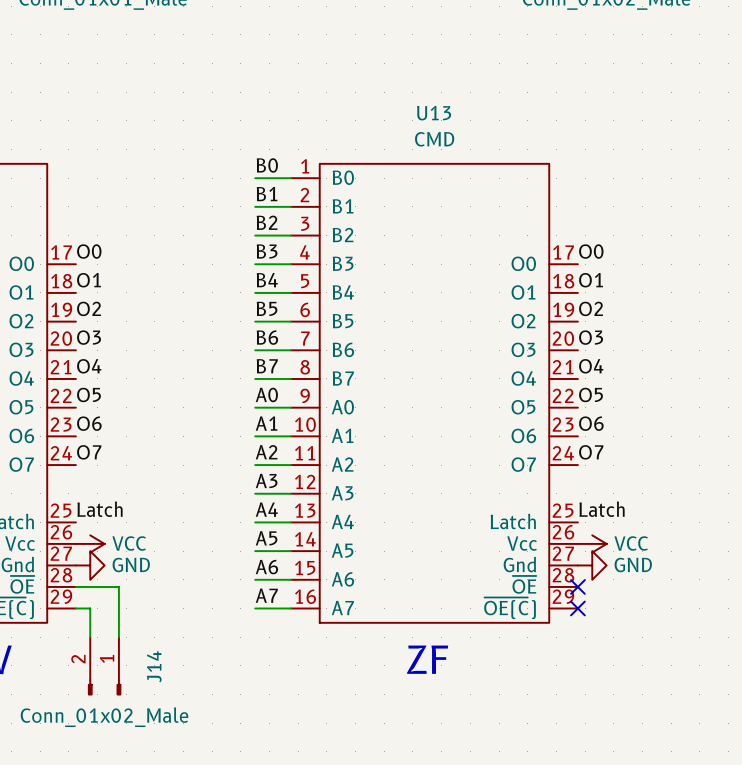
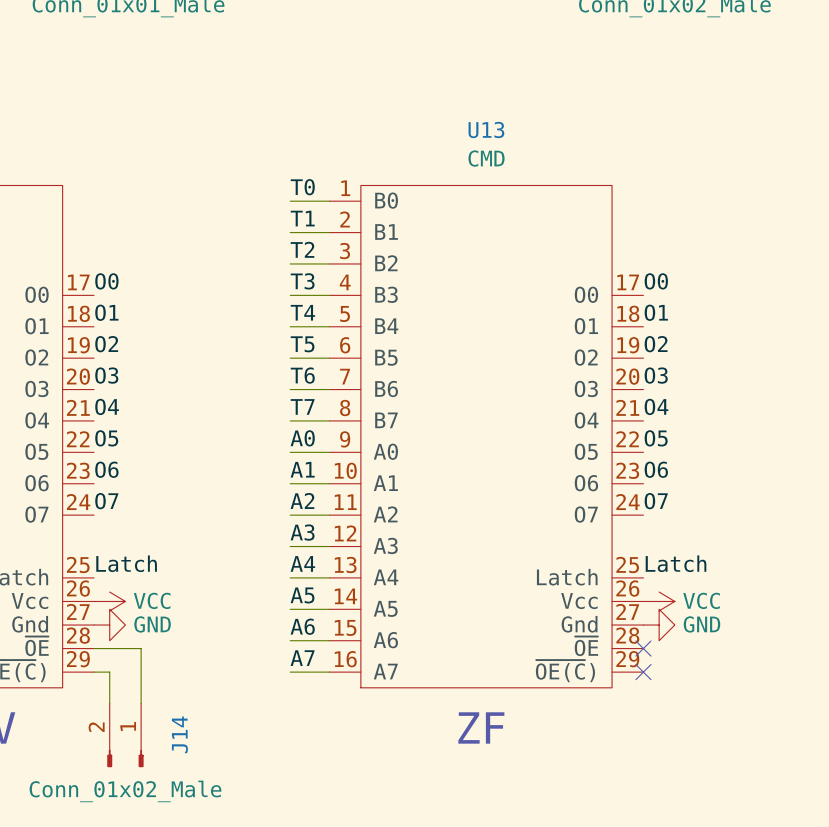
label: B0 (267, 165) -> T0 (302, 187)
label: B1 (267, 194) -> T1 (302, 218)
label: B2 (267, 222) -> T2 (302, 249)
label: B3 (267, 251) -> T3 (302, 281)
label: B4 (267, 280) -> T4 (302, 312)
label: B5 (267, 308) -> T5 (302, 344)
label: B6 (267, 337) -> T6 (302, 375)
label: B7 (267, 366) -> T7 (302, 406)

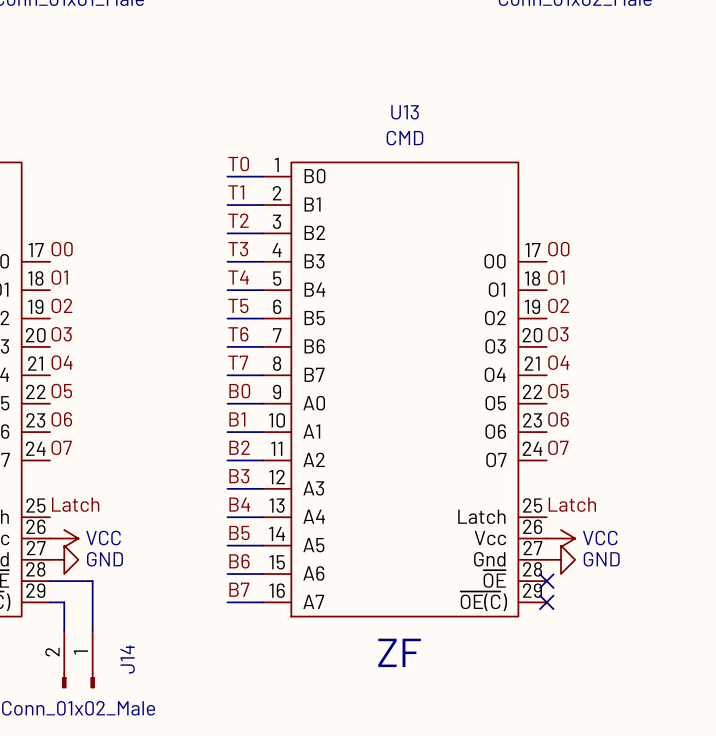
label: A0 (302, 438) -> B0 (239, 391)
label: A1 (302, 469) -> B1 (237, 419)
label: A2 (302, 500) -> B2 (239, 447)
label: A3 (302, 532) -> B3 (239, 476)
label: A4 (302, 563) -> B4 (239, 504)
label: A5 (302, 595) -> B5 (239, 533)
label: A6 (302, 626) -> B6 (239, 561)
label: A7 (302, 658) -> B7 (239, 589)

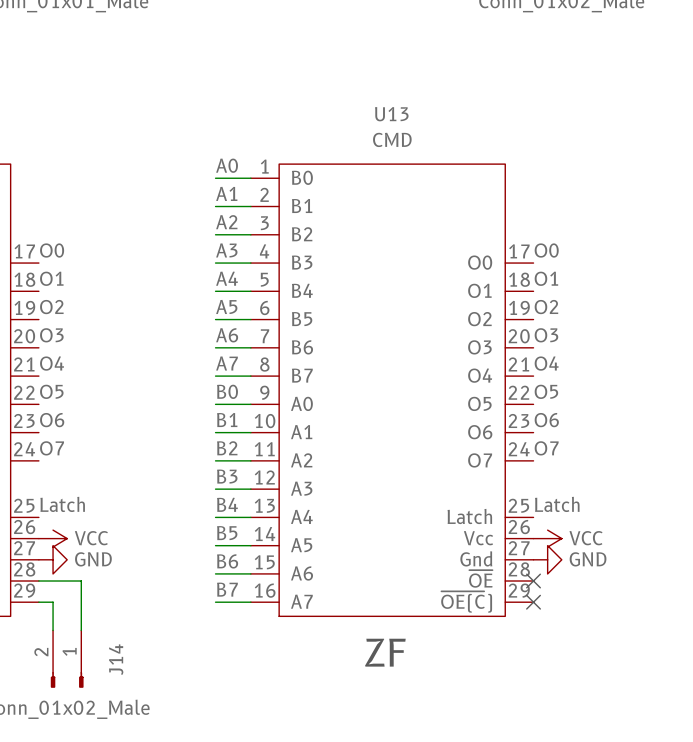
label: T0 (238, 163) -> A0 (227, 165)
label: T1 (236, 192) -> A1 (226, 193)
label: T2 (238, 220) -> A2 (226, 222)
label: T3 (238, 249) -> A3 (226, 250)
label: T4 (238, 277) -> A4 (227, 278)
label: T5 (238, 305) -> A5 (226, 306)
label: T6 (238, 334) -> A6 (227, 335)
label: T7 (238, 362) -> A7 (227, 363)

